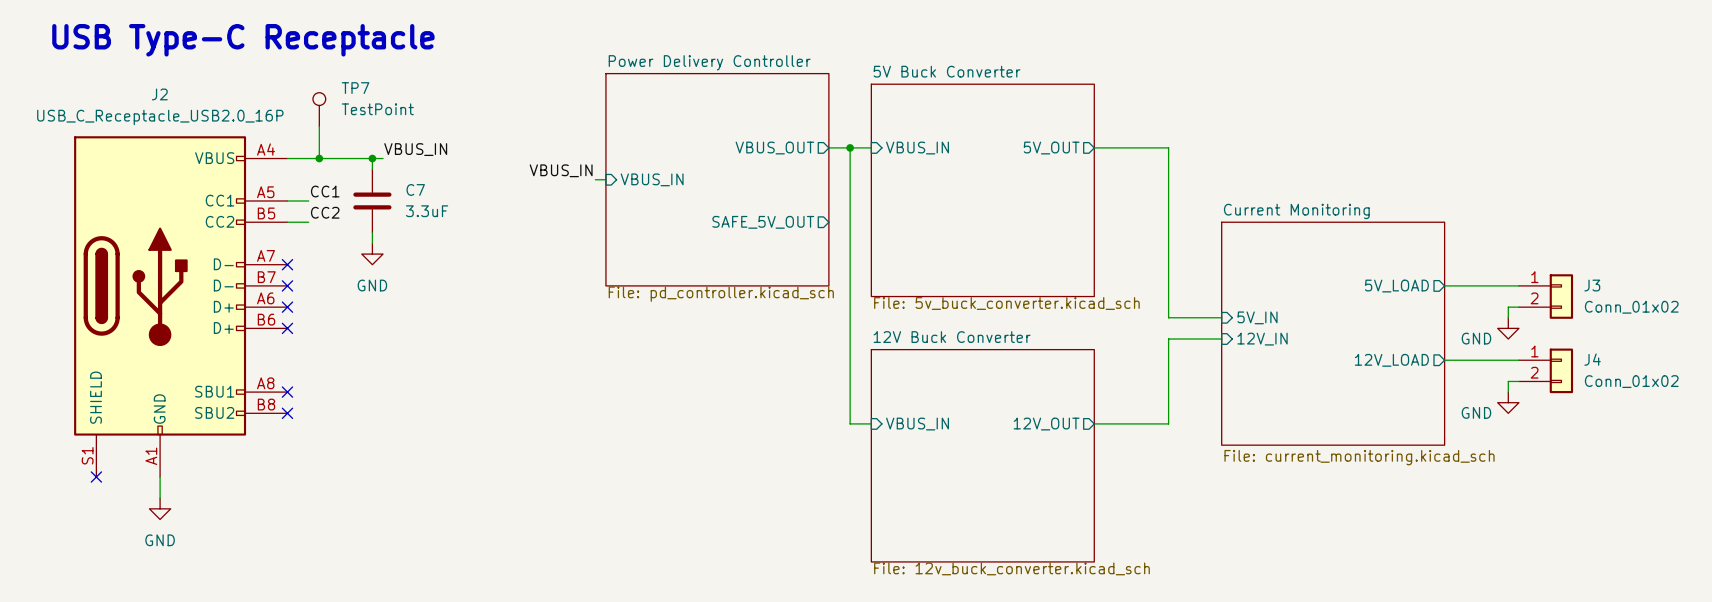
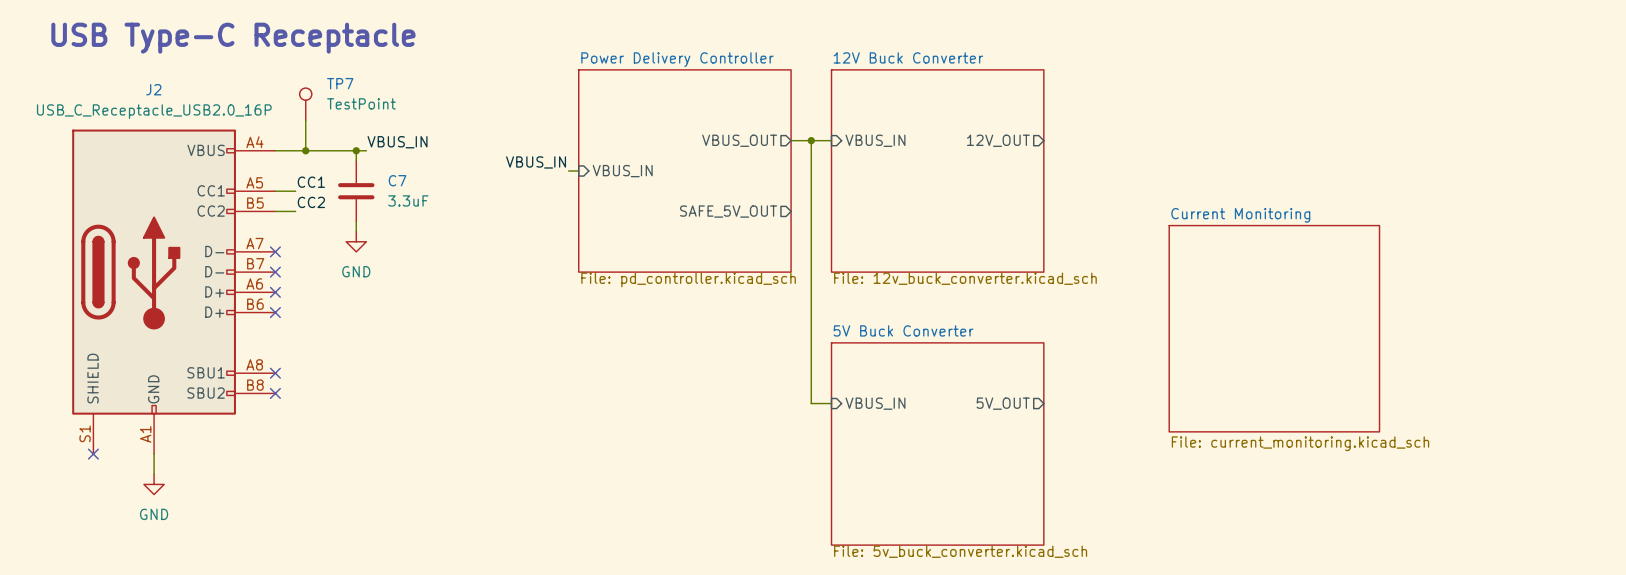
wire: (1094, 147) (1168, 147) (1168, 317) (1221, 317) -> none
sheet pin: 5V_OUT (1051, 148) -> 12V_OUT (998, 140)
sheet 5V Buck Converter position: (982, 190) -> (937, 443)
wire: (1444, 285) (1518, 285) -> none
sheet pin: 5V_LOAD (1396, 286) -> none
J3: Conn_01x02 (1546, 296) -> none
wire: (1518, 307) (1508, 307) (1508, 317) -> none
sheet pin: 5V_IN (1257, 317) -> none
power symbol: GND (1508, 328) -> none
sheet Current Monitoring: File: current_monitoring.kicad_sch (1333, 333) -> none
wire: (1221, 339) (1168, 339) (1168, 423) (1094, 423) -> none
sheet pin: 12V_IN (1262, 339) -> none
sheet Current Monitoring: none -> File: current_monitoring.kicad_sch (1274, 328)
sheet pin: 12V_LOAD (1391, 360) -> none
wire: (1444, 360) (1518, 360) -> none
J4: Conn_01x02 (1546, 370) -> none
wire: (1518, 381) (1508, 381) (1508, 392) -> none
power symbol: GND (1508, 402) -> none
sheet pin: 12V_OUT (1046, 424) -> 5V_OUT (1003, 403)
sheet 12V Buck Converter position: (982, 455) -> (937, 170)

